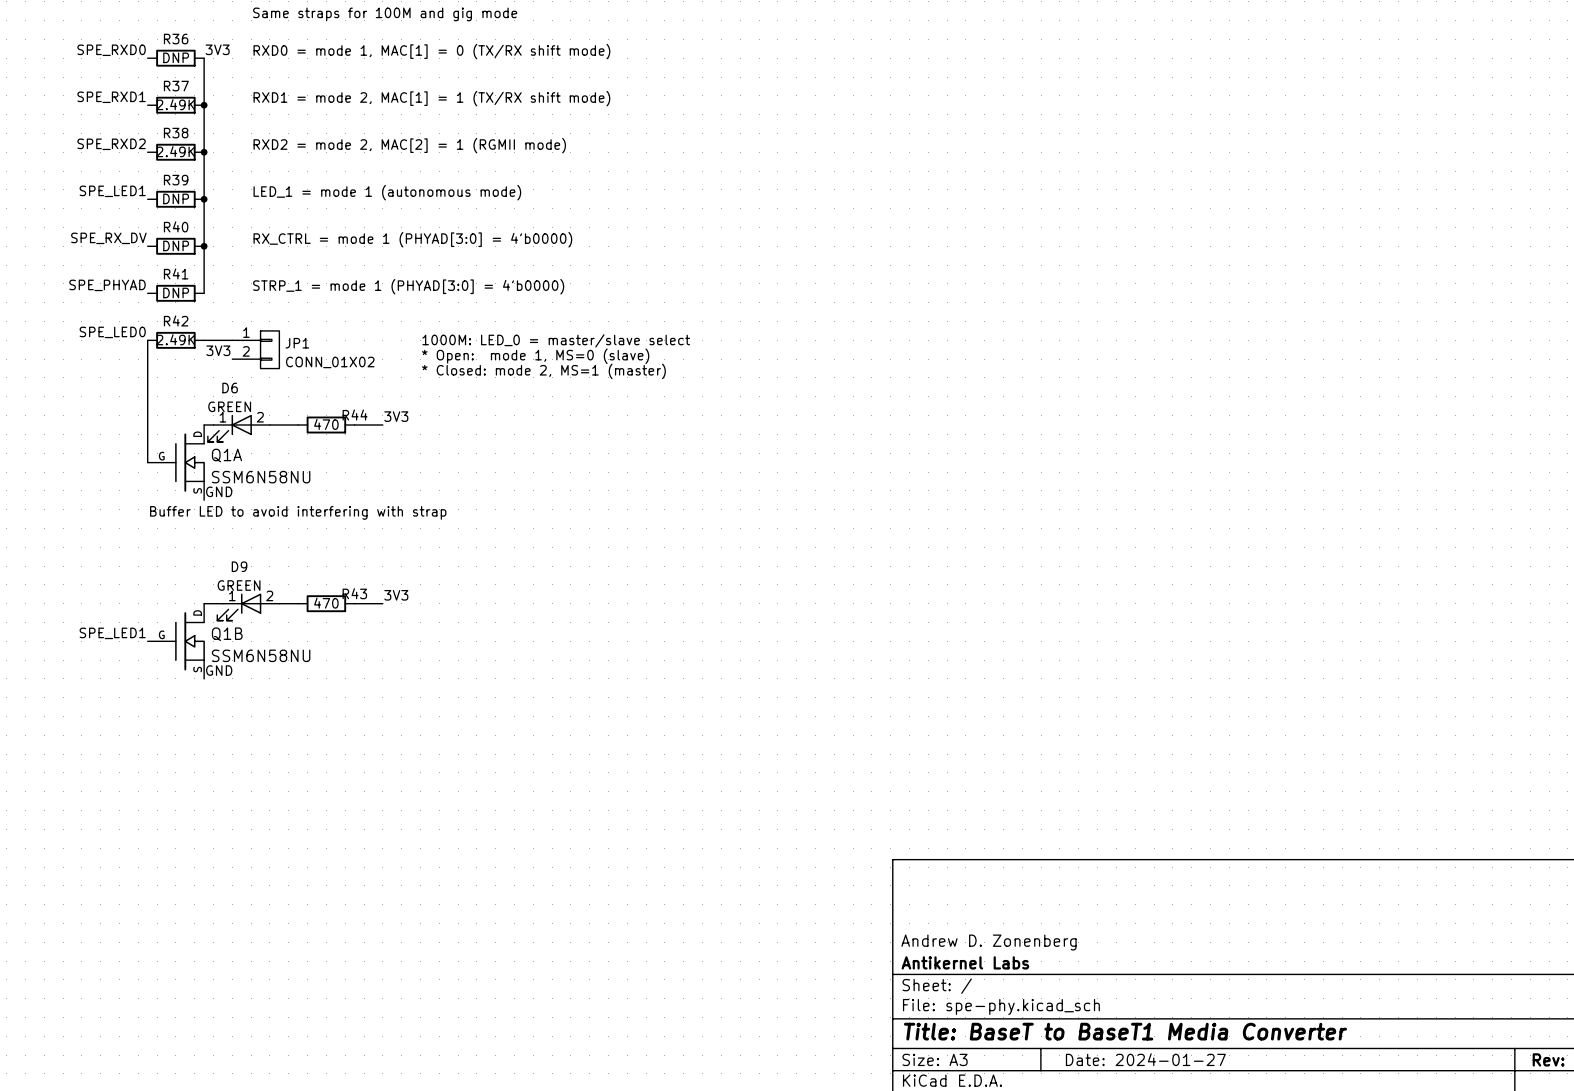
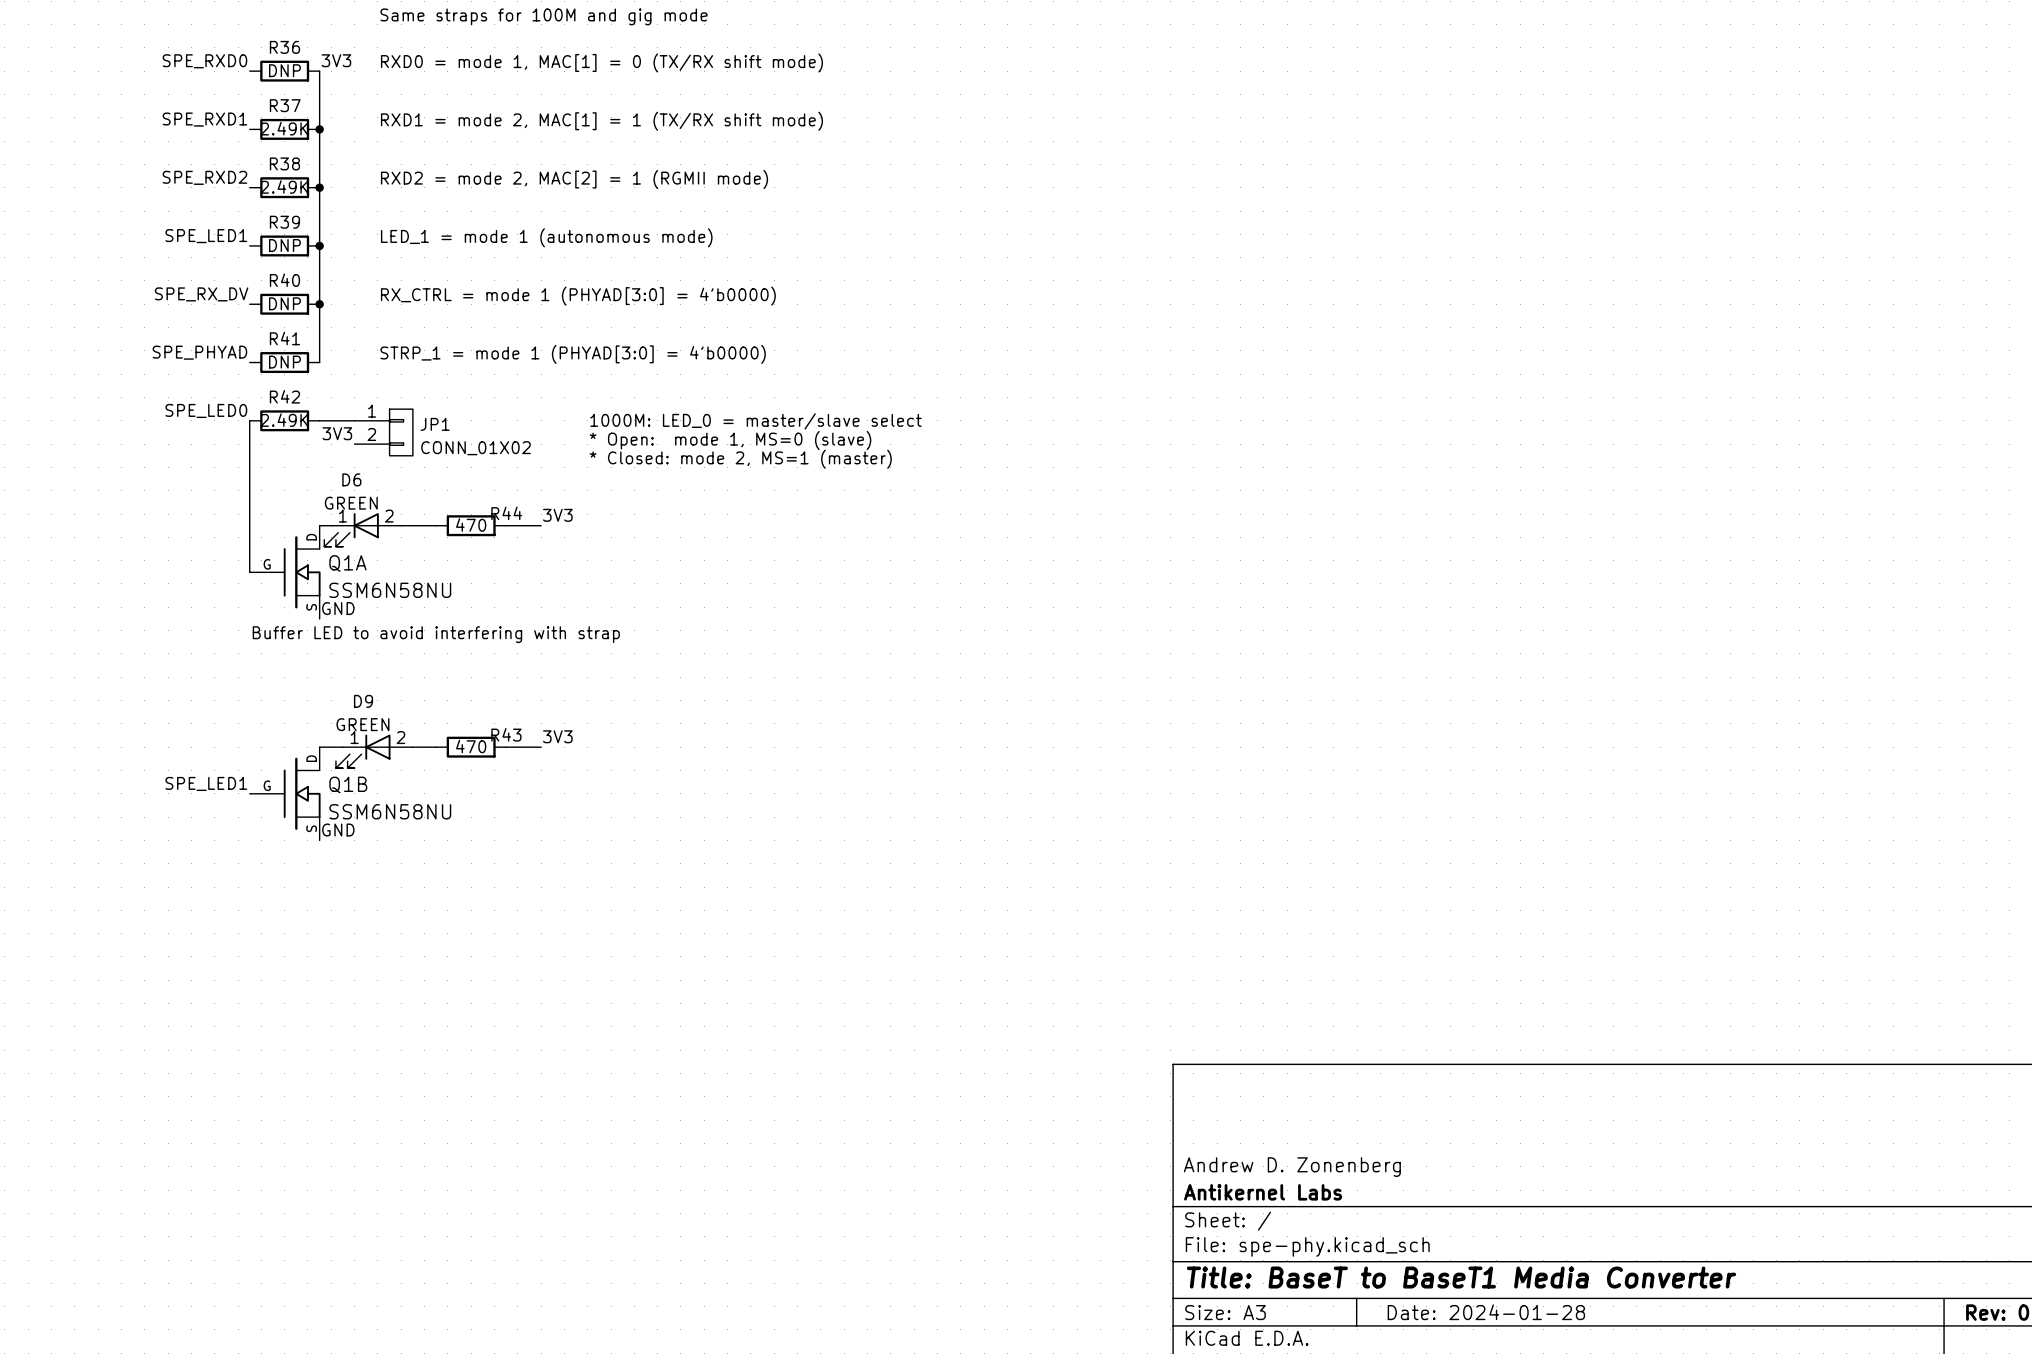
title block: Date: 2024-01-27 (1145, 1059) -> Date: 2024-01-28 (1486, 1312)

